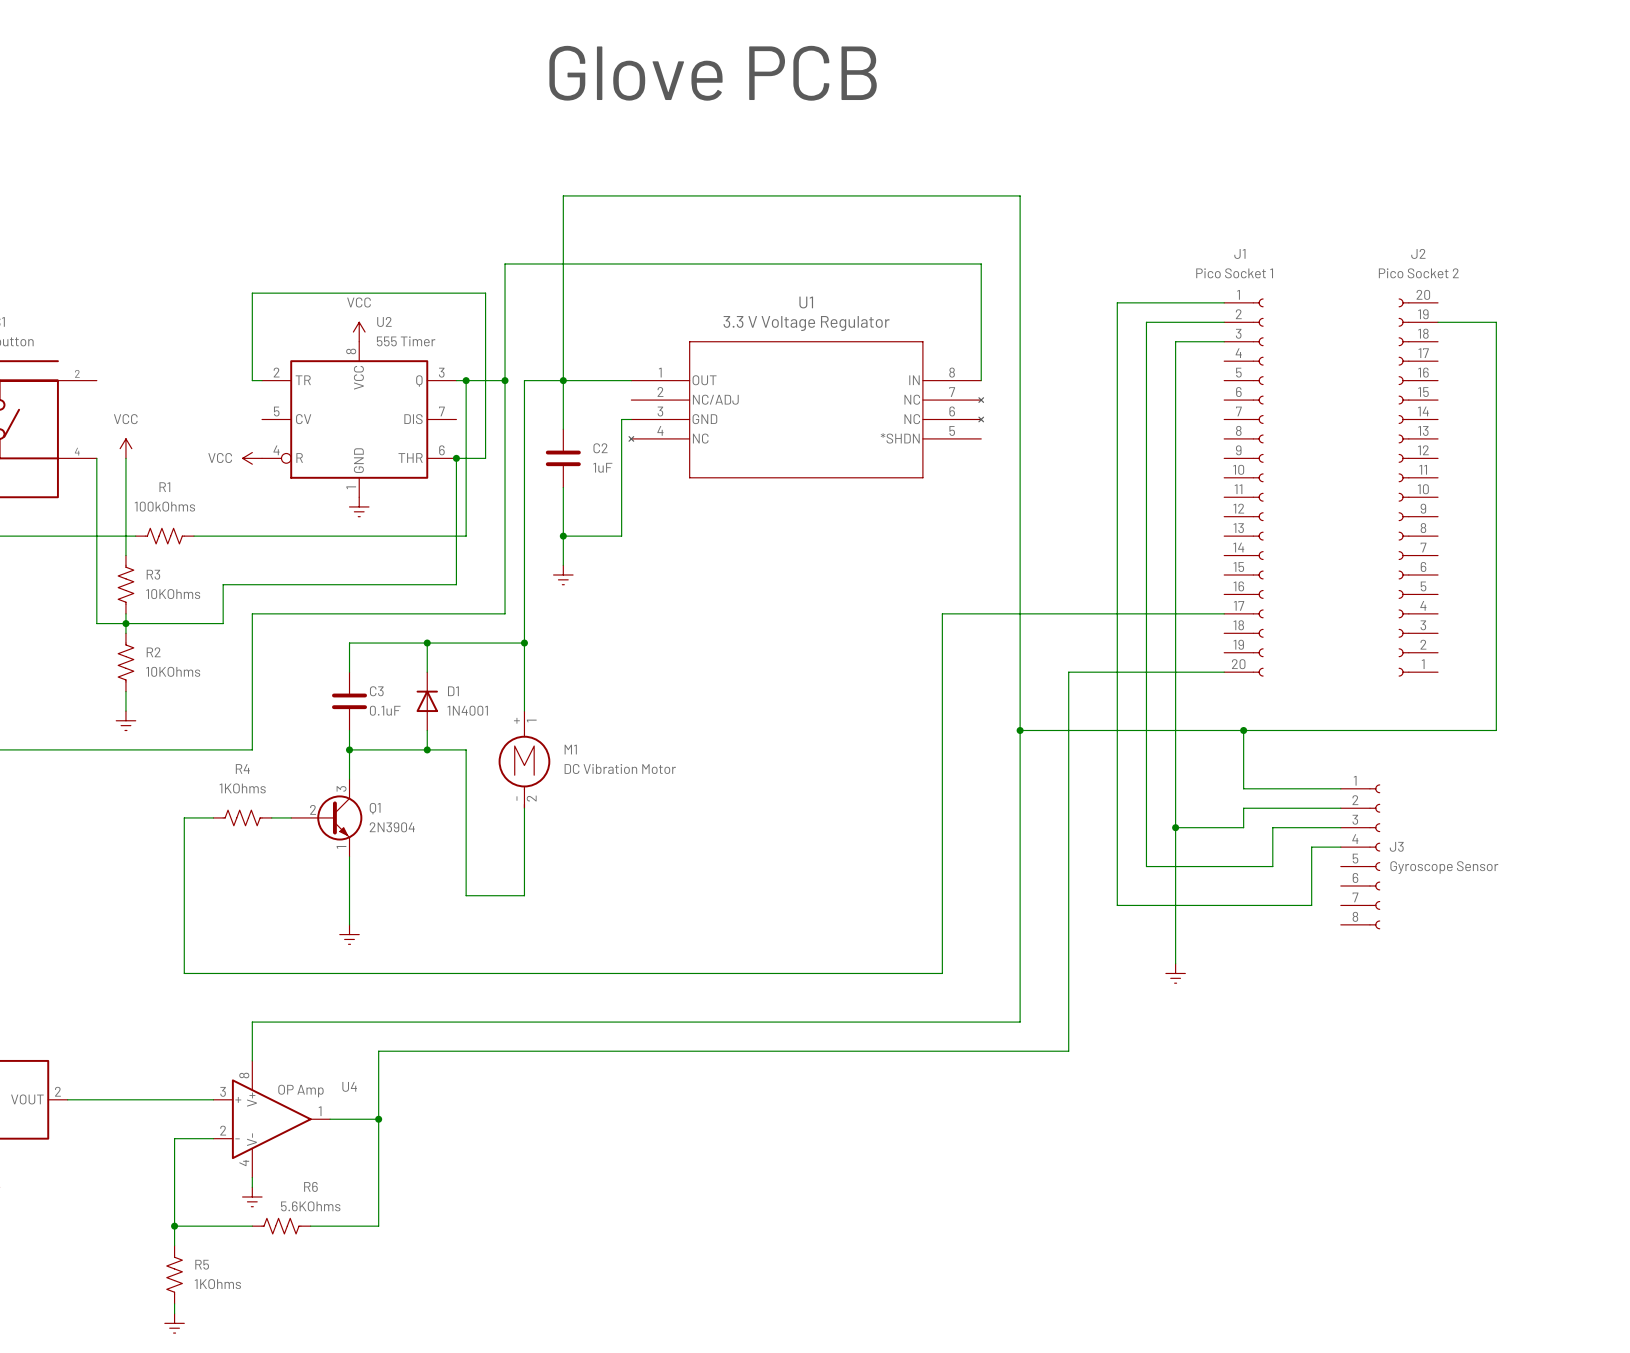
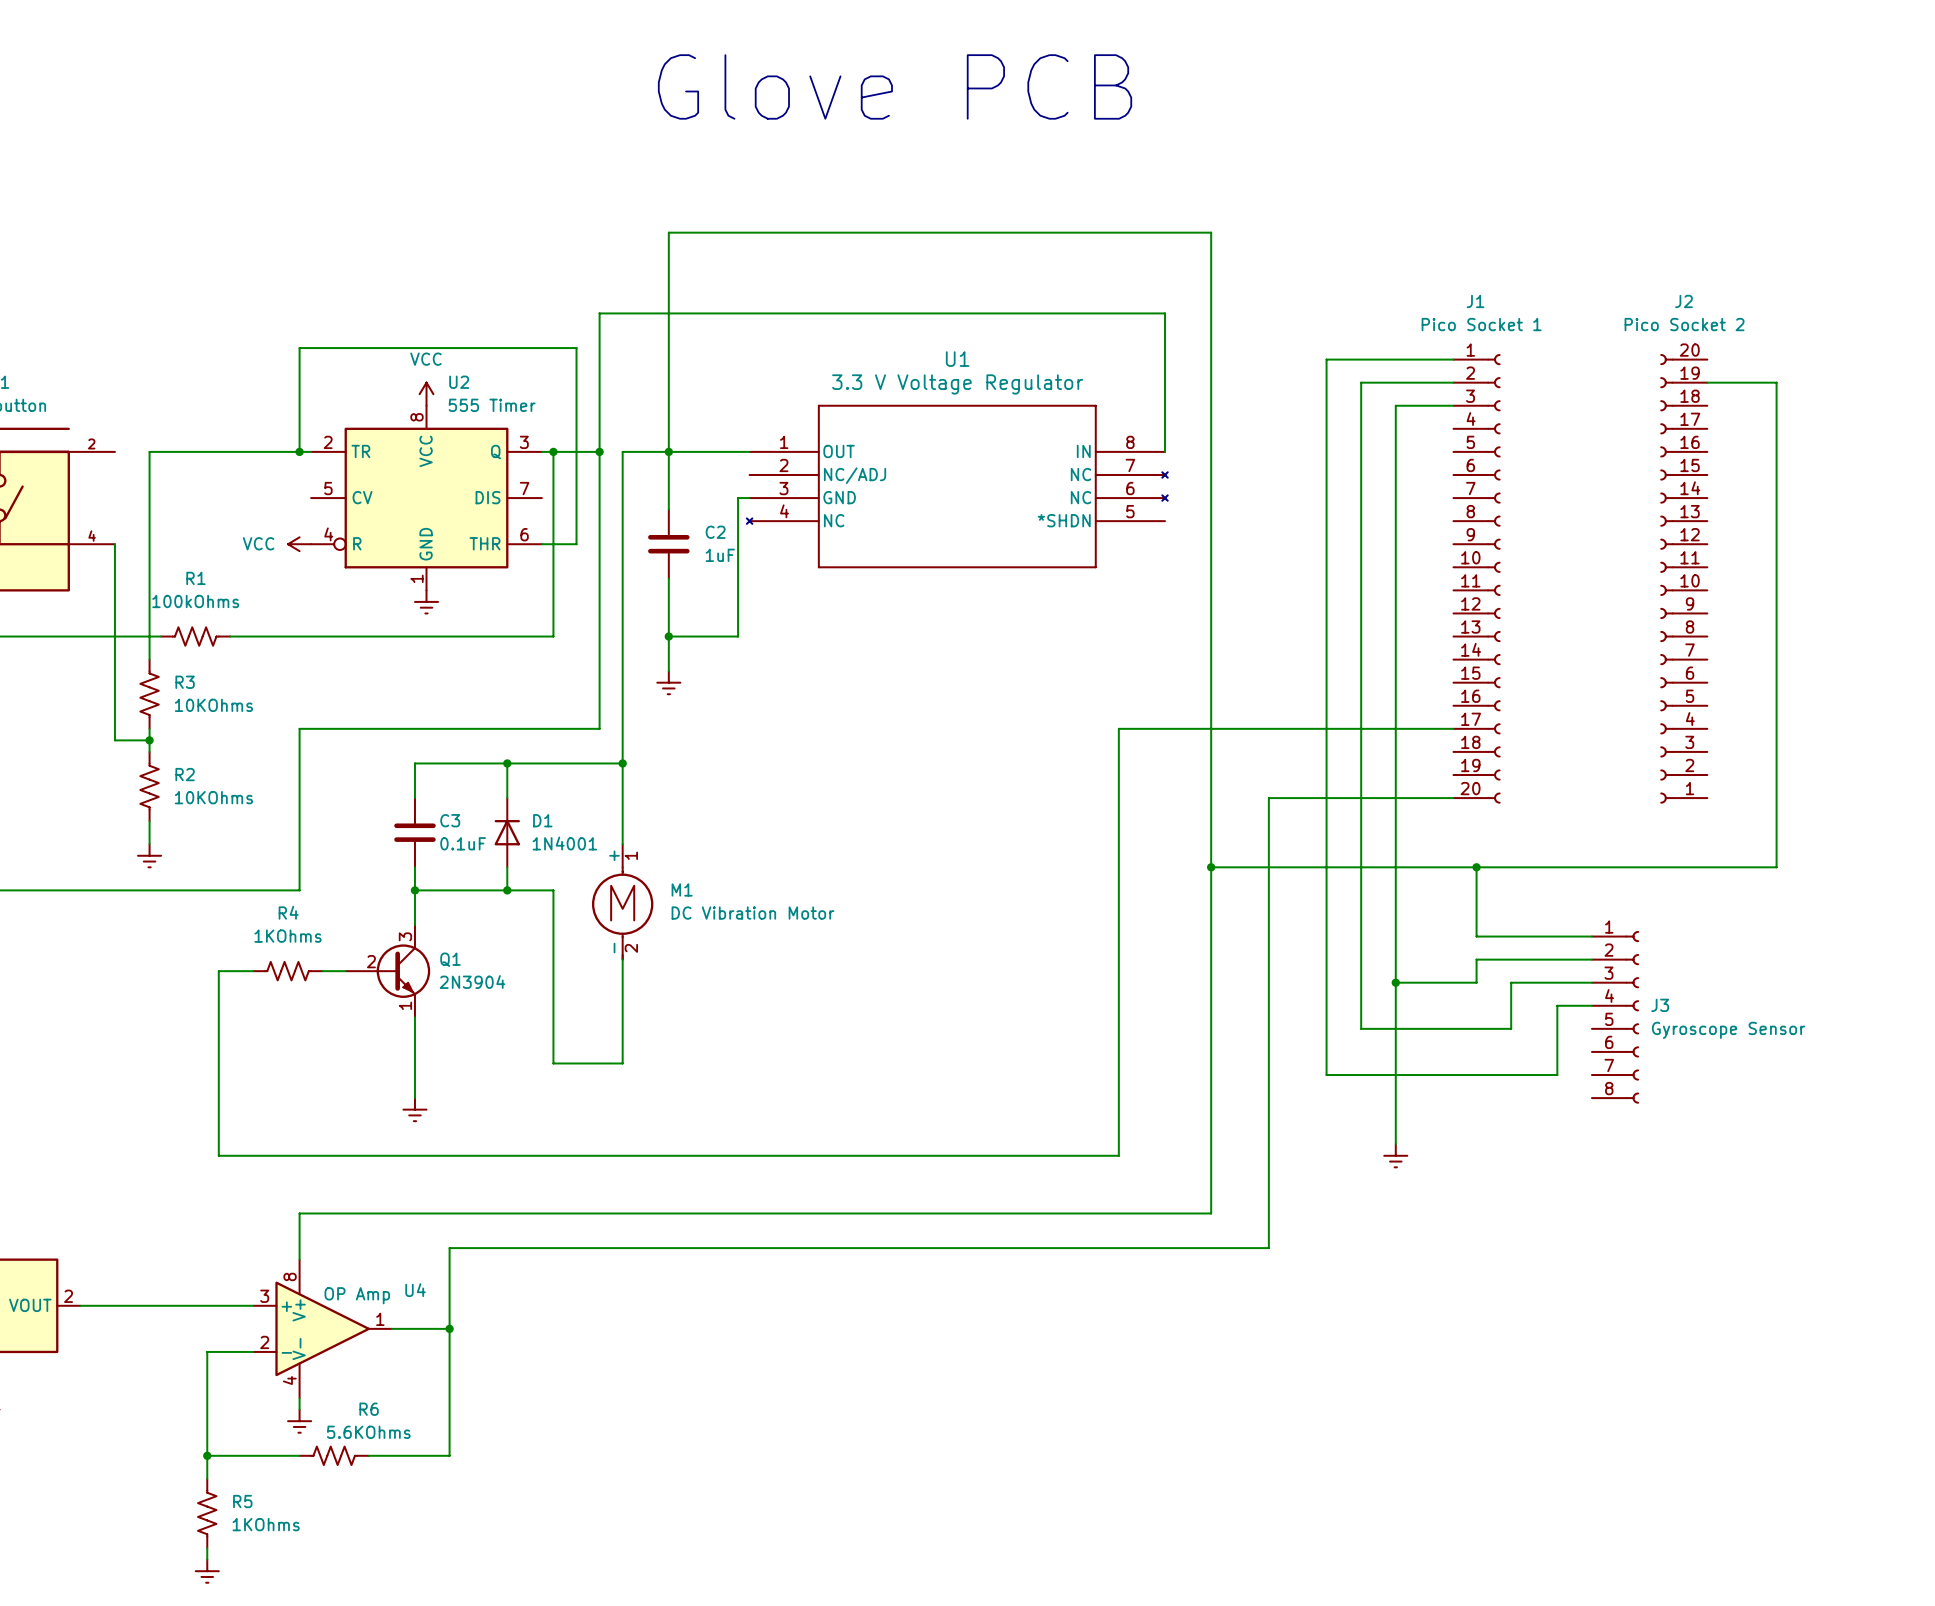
wire: none -> (299, 451) (149, 451) (149, 544)
junction: none -> (299, 451)
power symbol: VCC (125, 448) -> none
wire: (456, 458) (456, 584) (223, 584) (223, 623) (125, 623) -> none
junction: (456, 458) -> none

